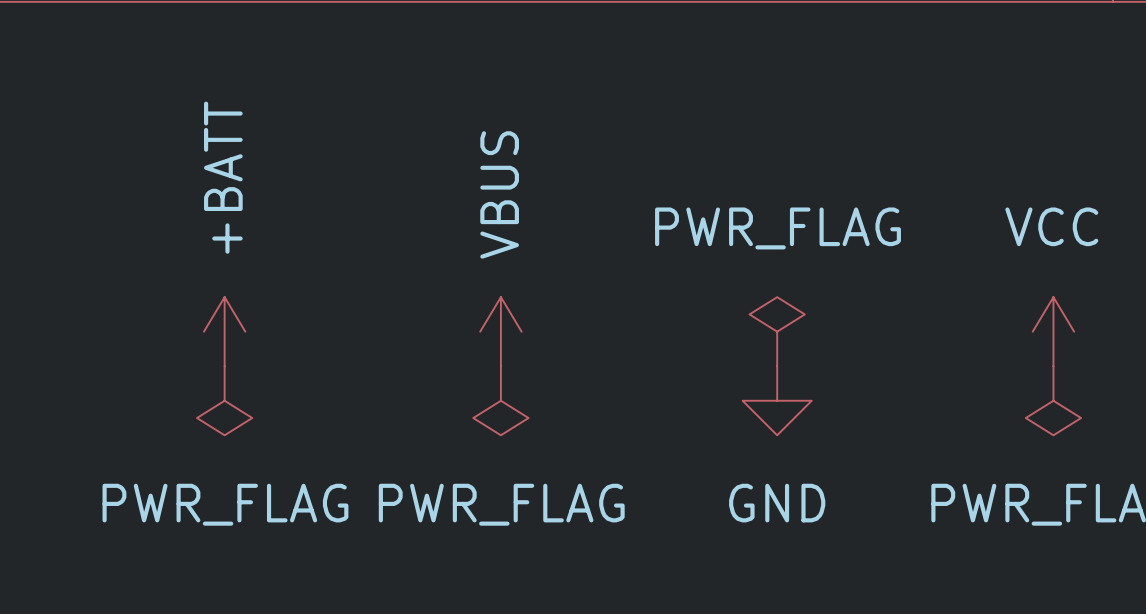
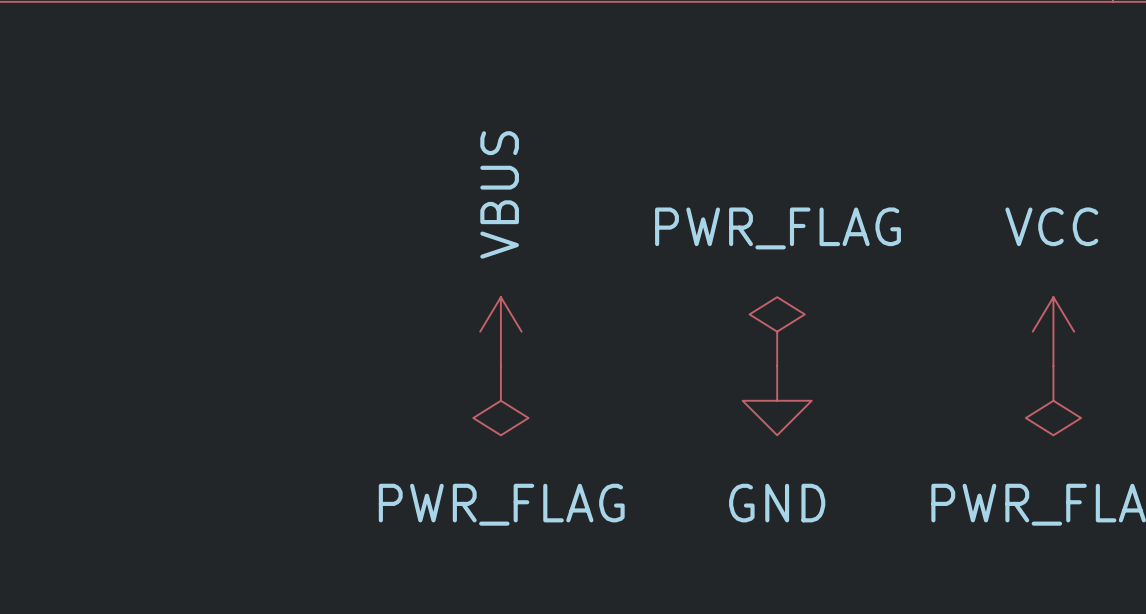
power symbol: +BATT (224, 331) -> none
power symbol: PWR_FLAG (224, 400) -> none

